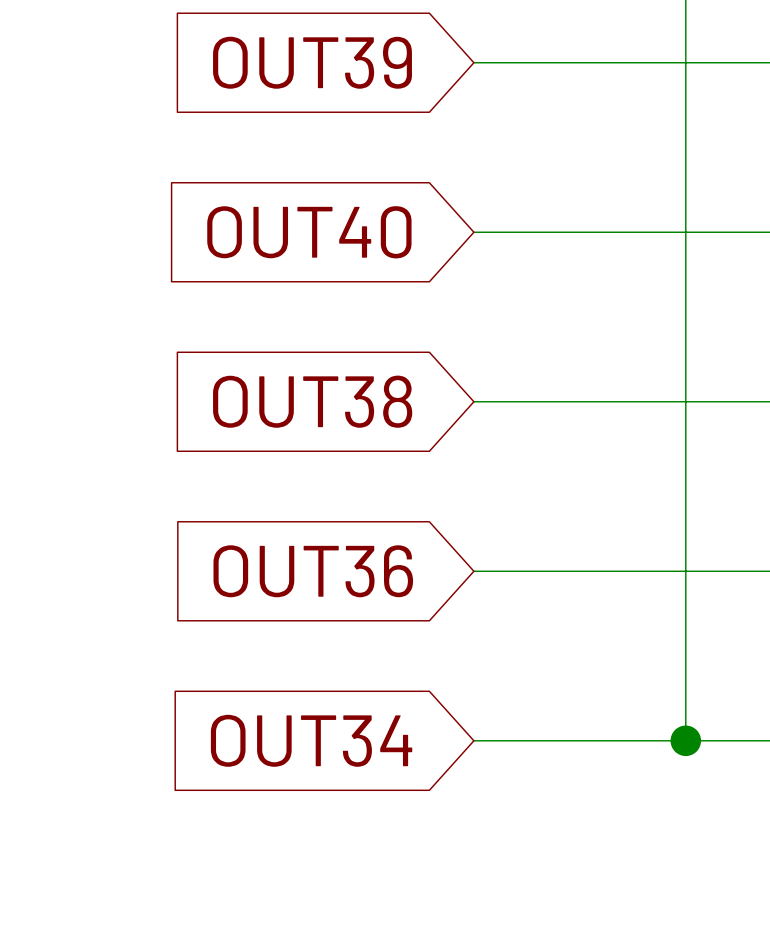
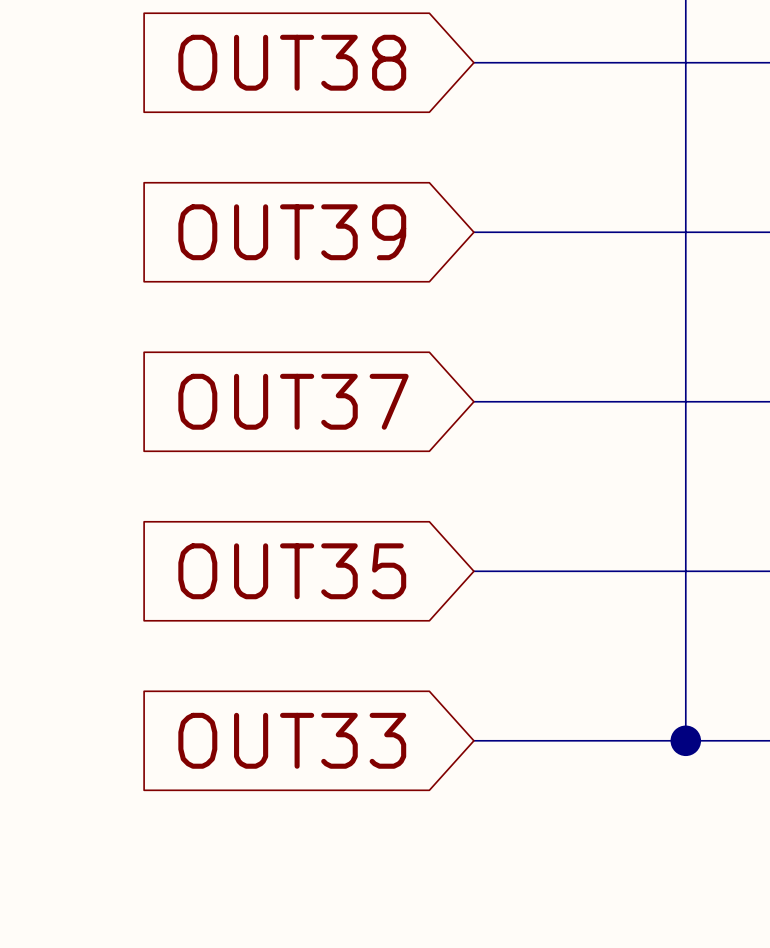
global label: OUT39 (312, 62) -> OUT38 (292, 62)
global label: OUT40 (309, 232) -> OUT39 (292, 232)
global label: OUT38 (312, 401) -> OUT37 (293, 401)
global label: OUT36 (313, 571) -> OUT35 (292, 571)
global label: OUT34 (311, 740) -> OUT33 (292, 740)

